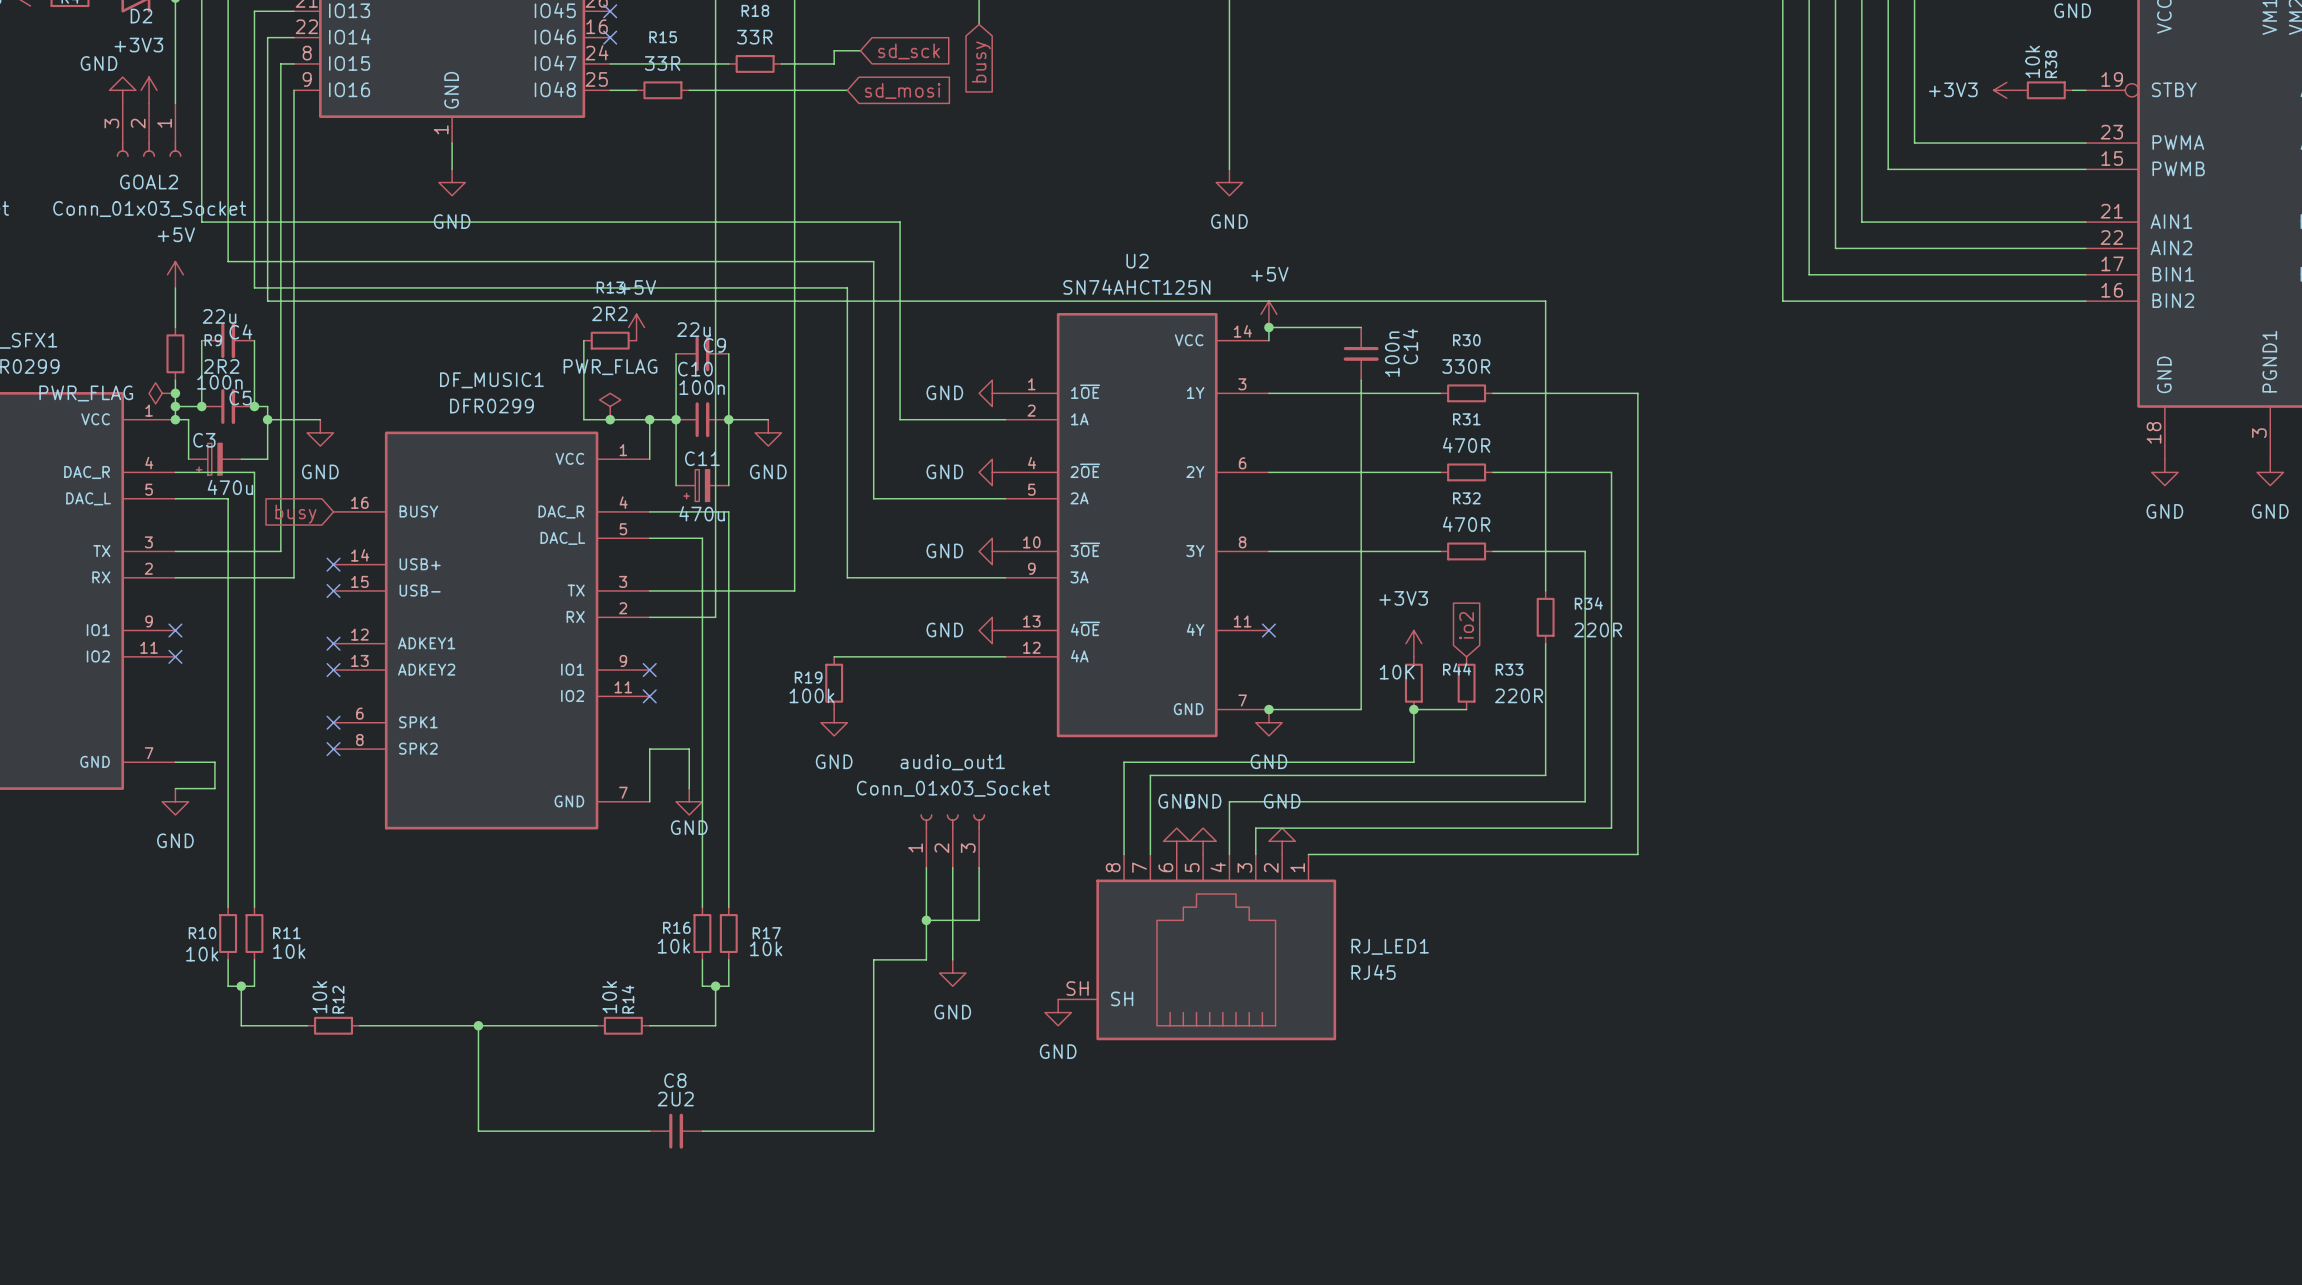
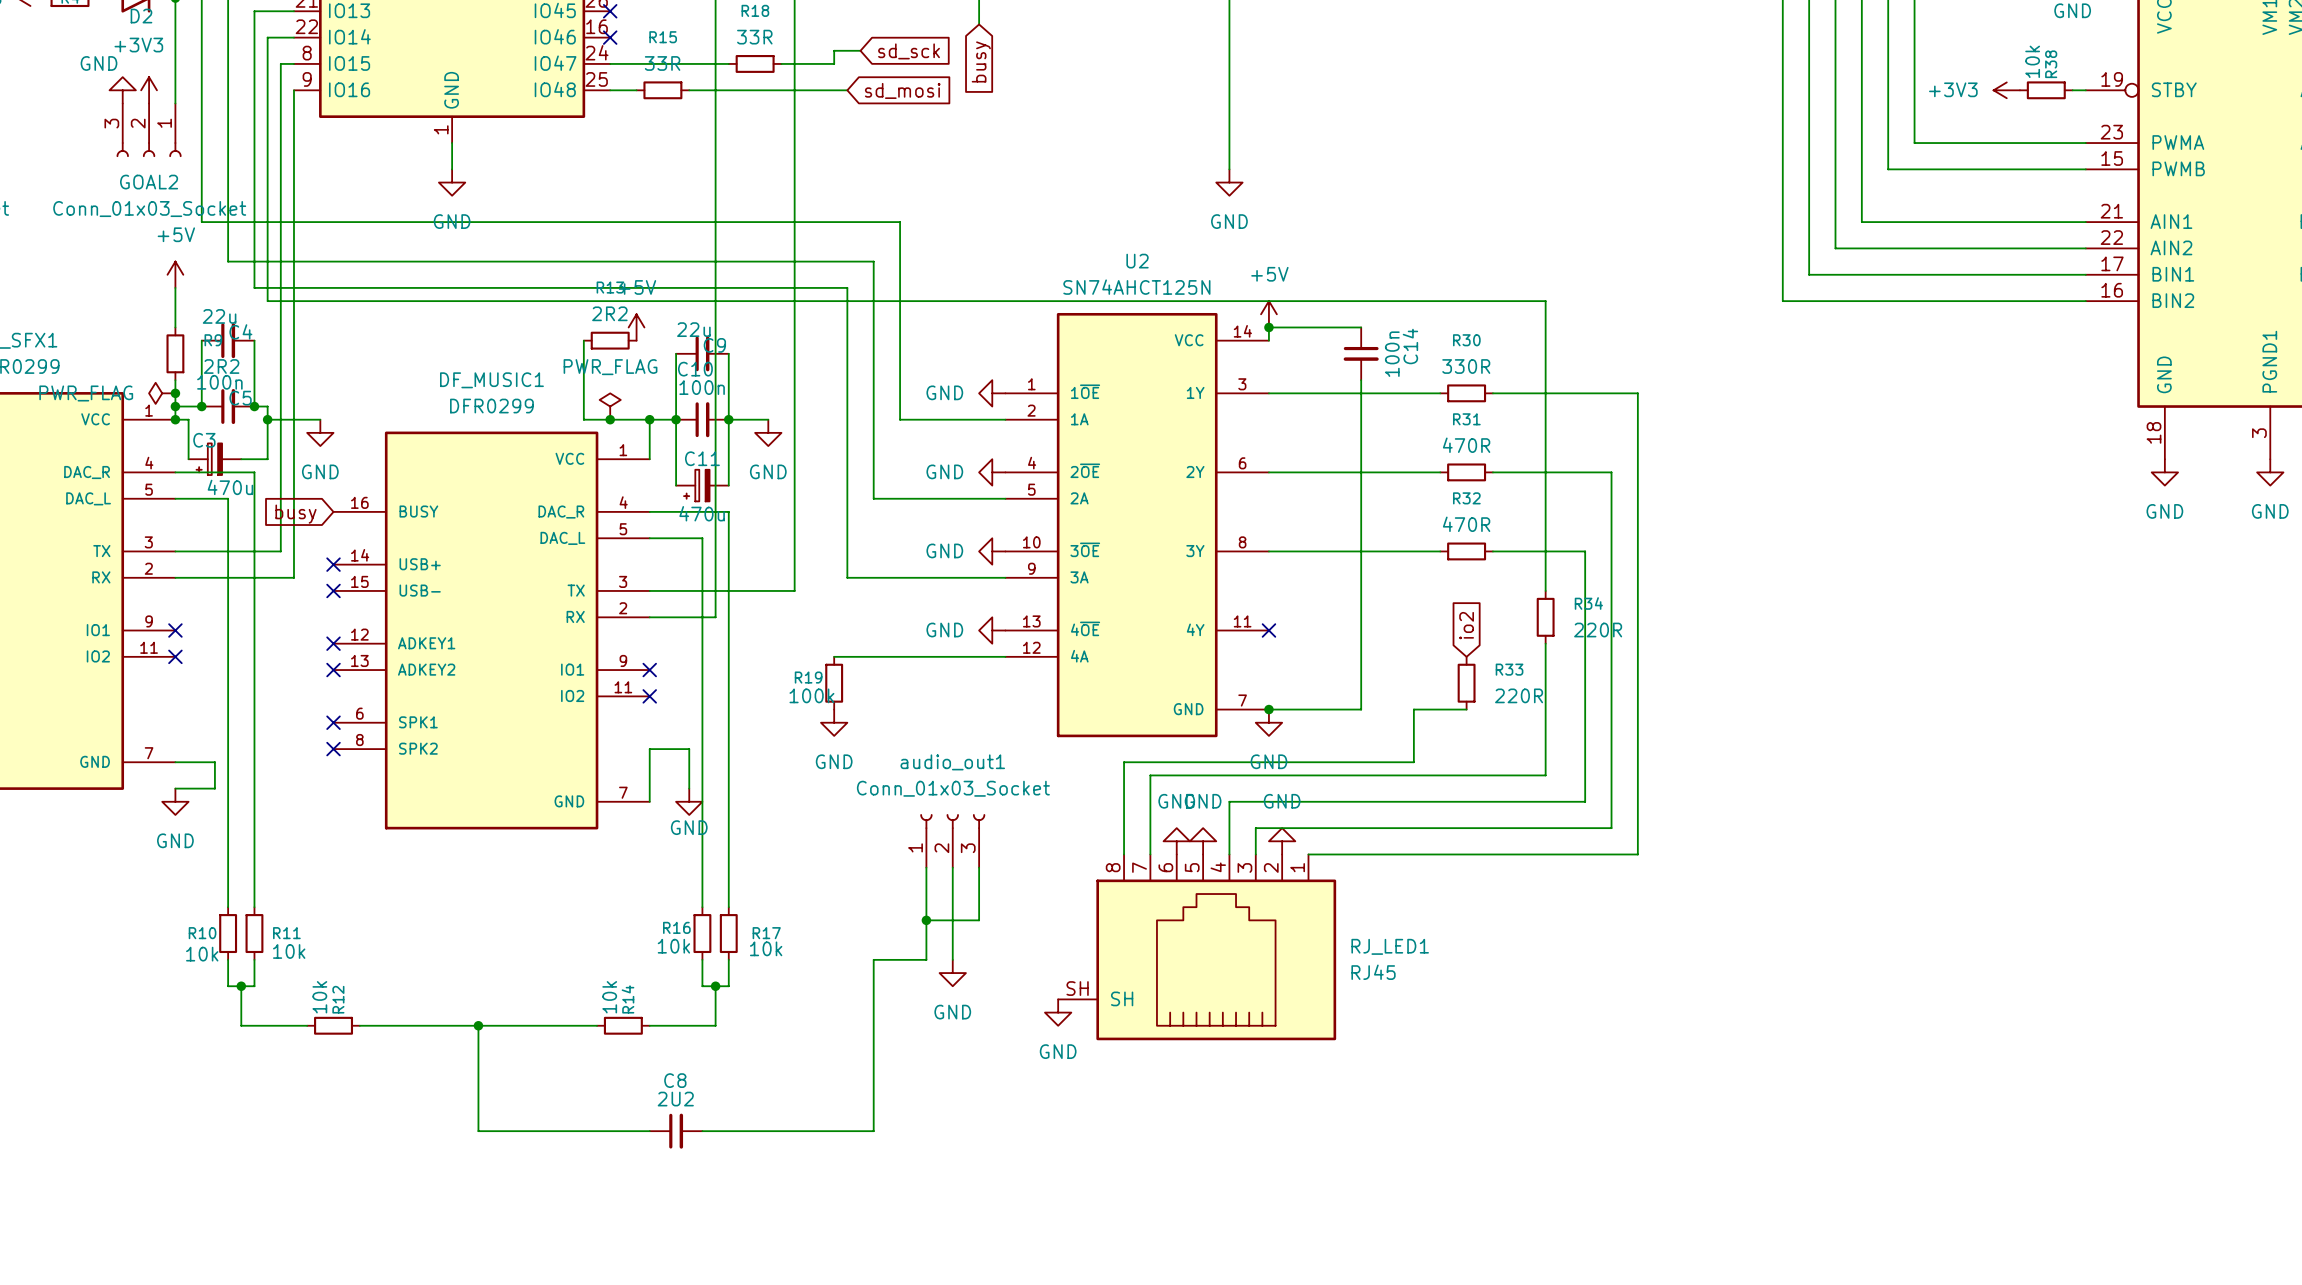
power symbol: +3V3 (1413, 643) -> none
R44: 10K (1413, 683) -> none
junction: (1413, 709) -> none

